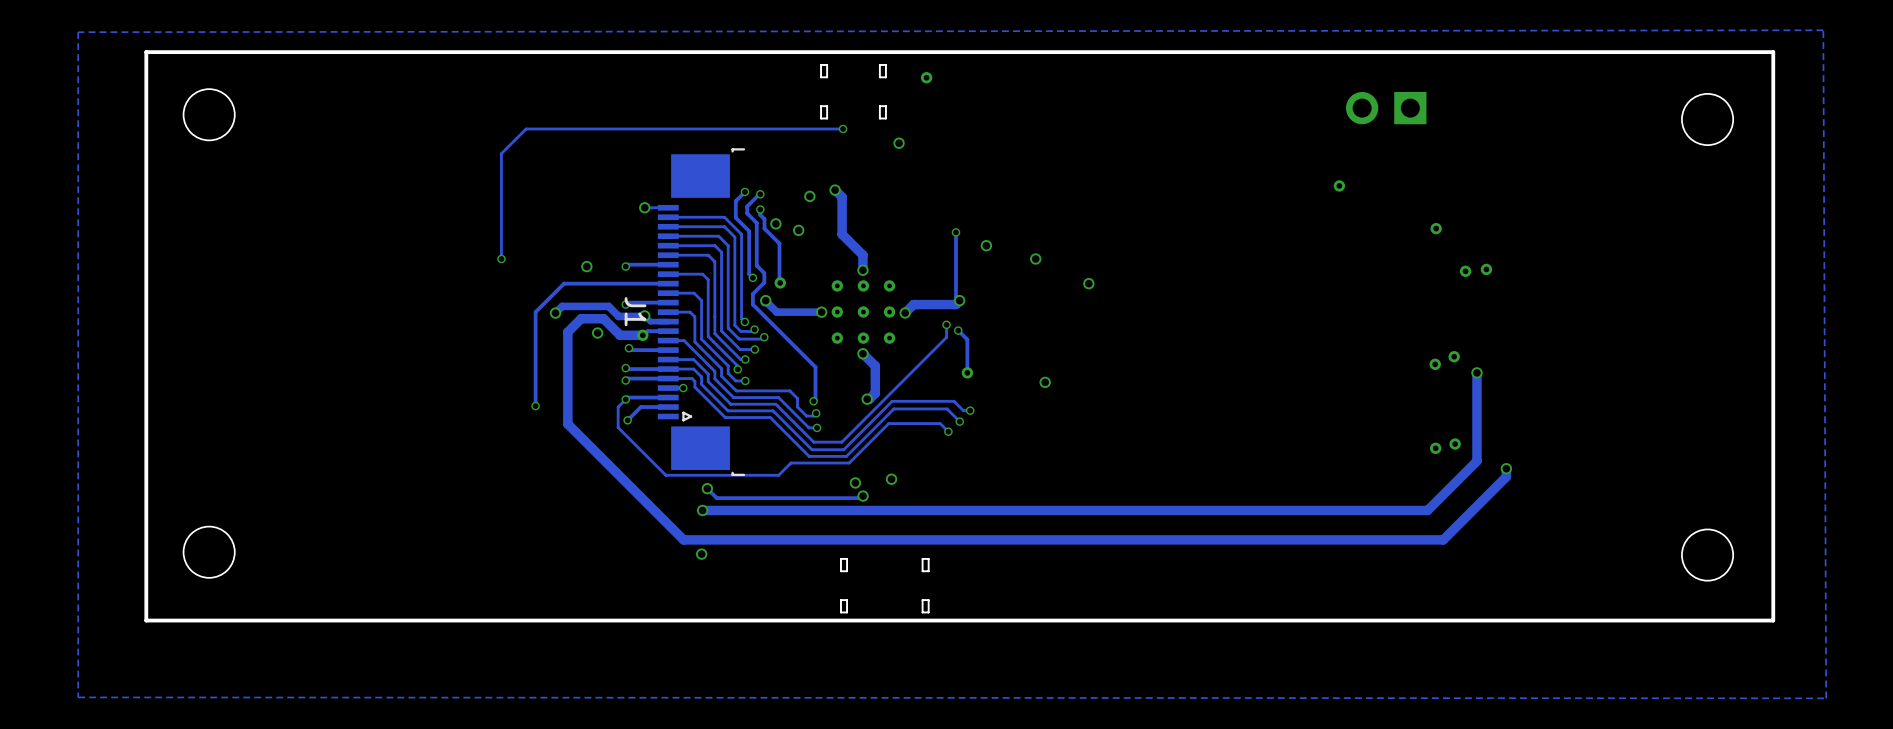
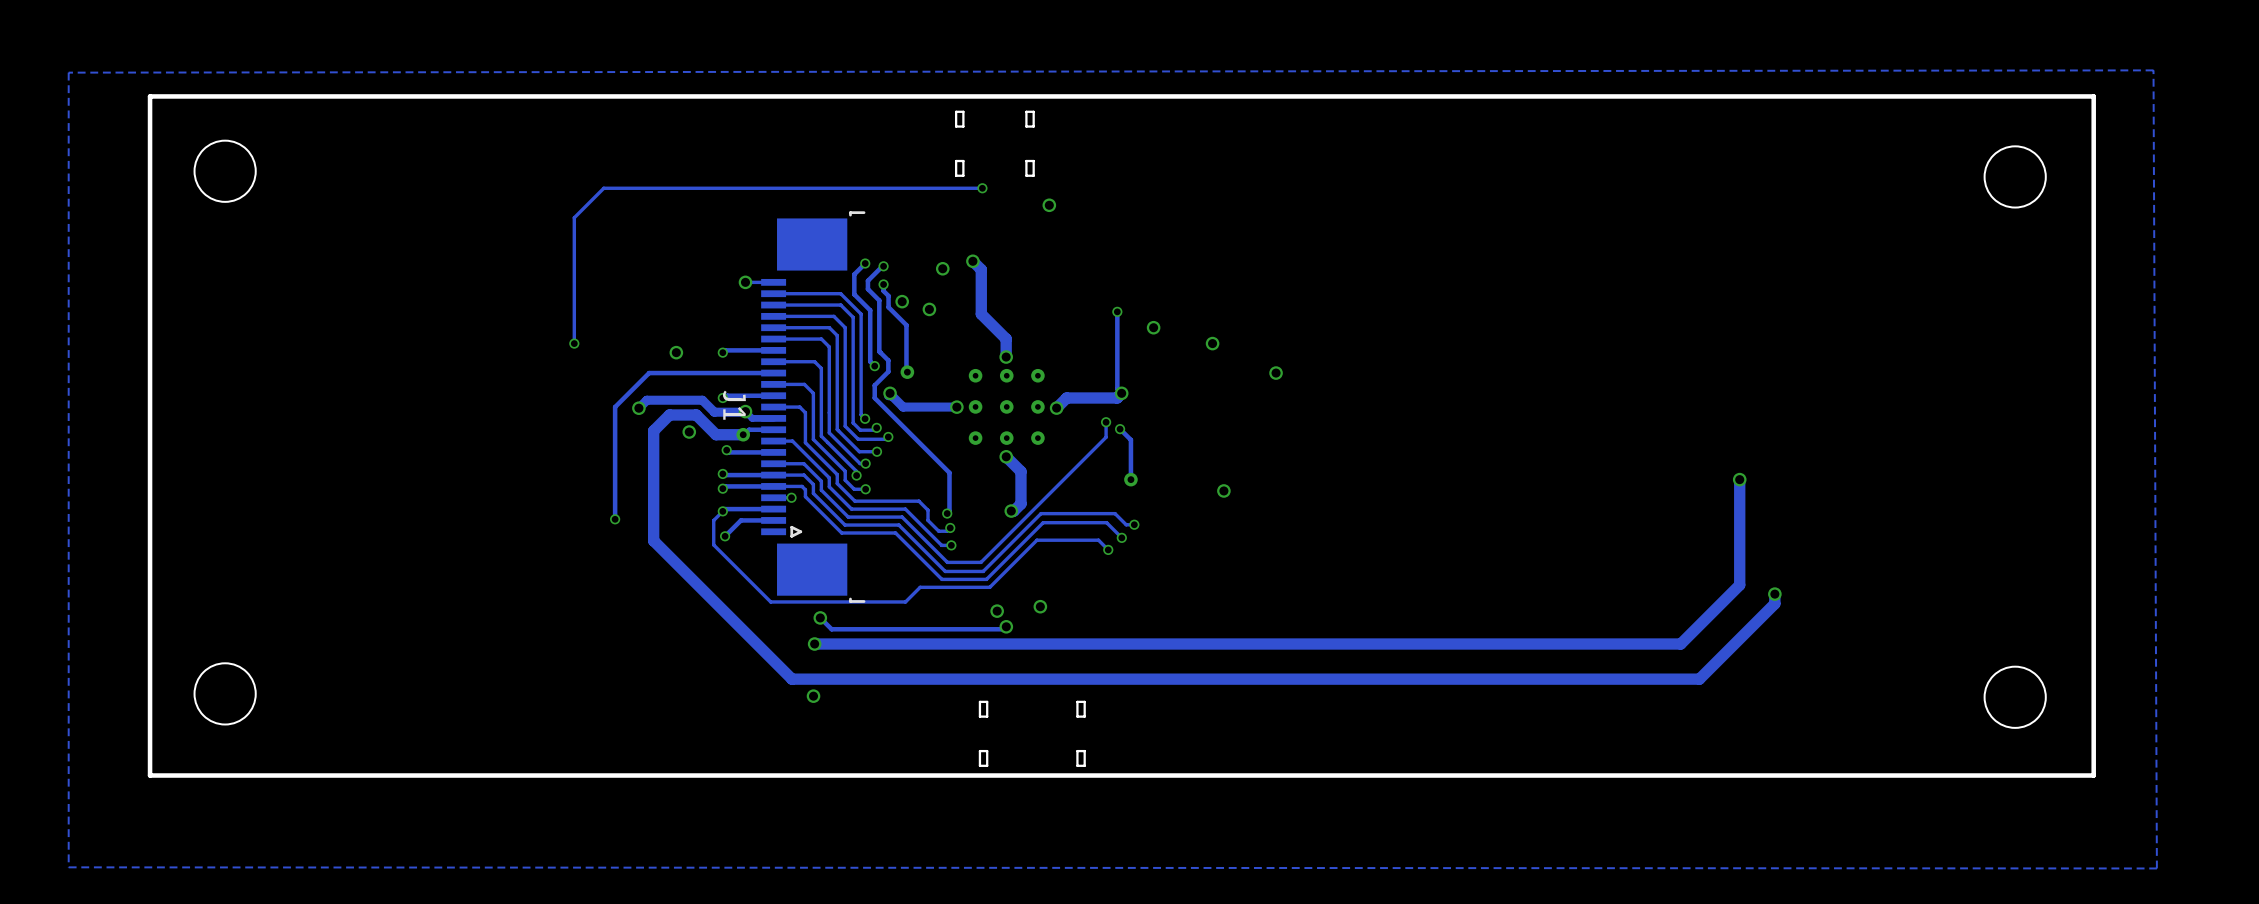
via: (926, 77) -> none
part: (1386, 108) -> none
via: (1339, 185) -> none
via: (1436, 228) -> none
via: (1486, 269) -> none
via: (1465, 271) -> none
via: (1454, 356) -> none
via: (1435, 364) -> none
via: (1455, 444) -> none
via: (1435, 448) -> none

